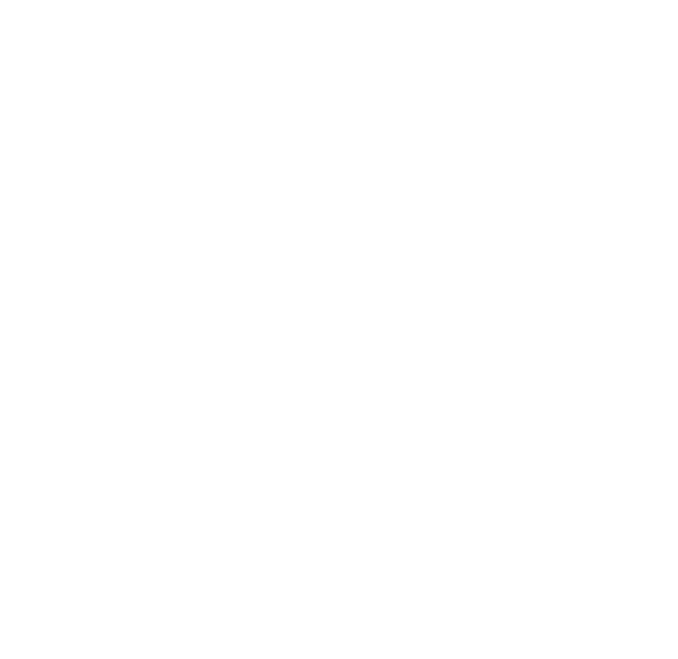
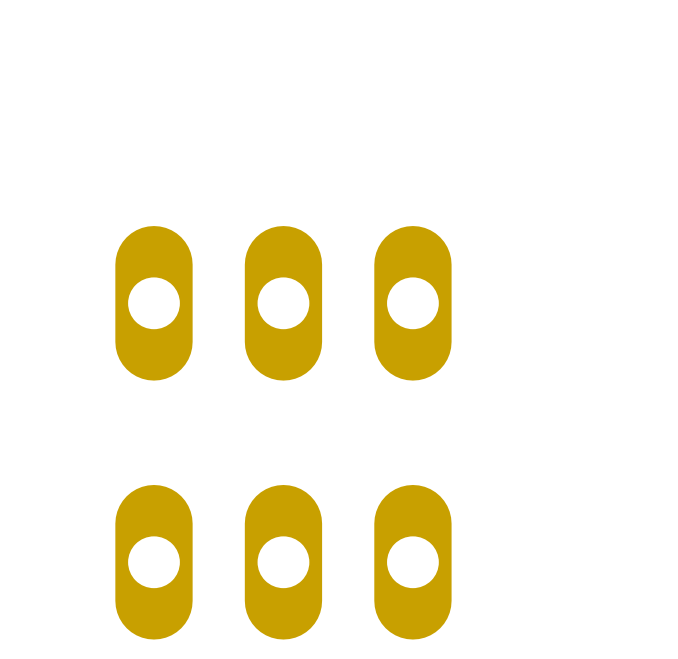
part: none -> (283, 303)
part: none -> (283, 562)

